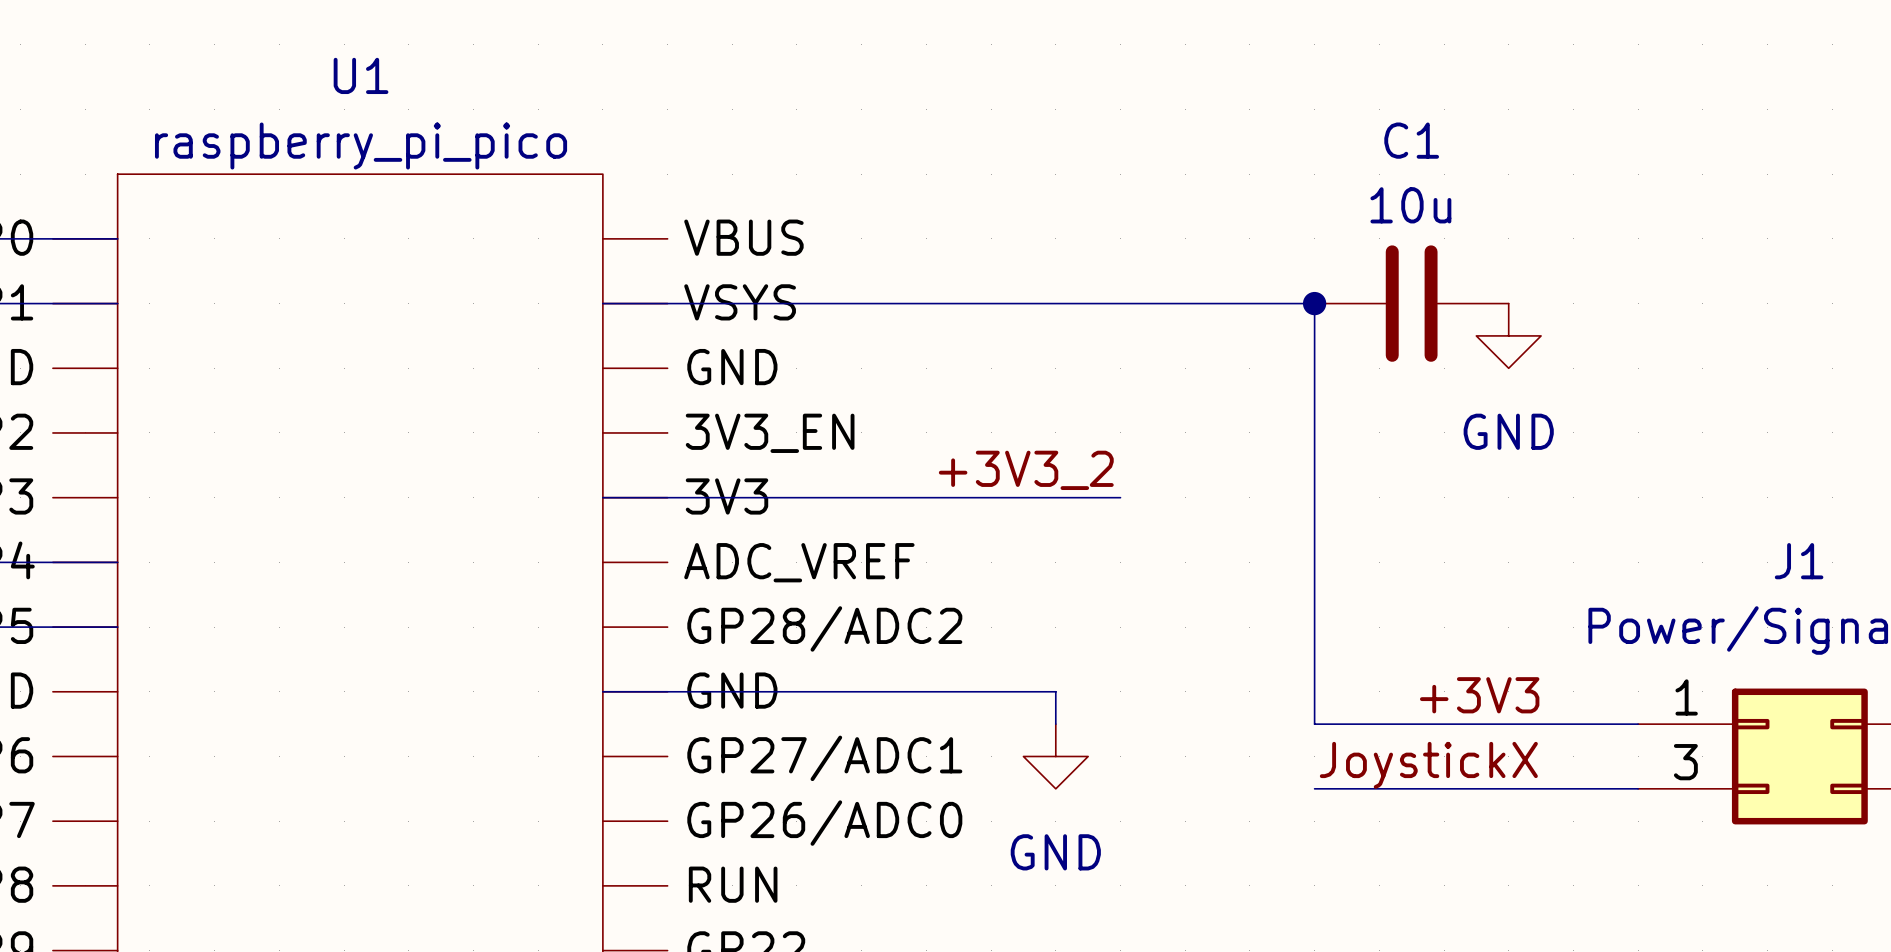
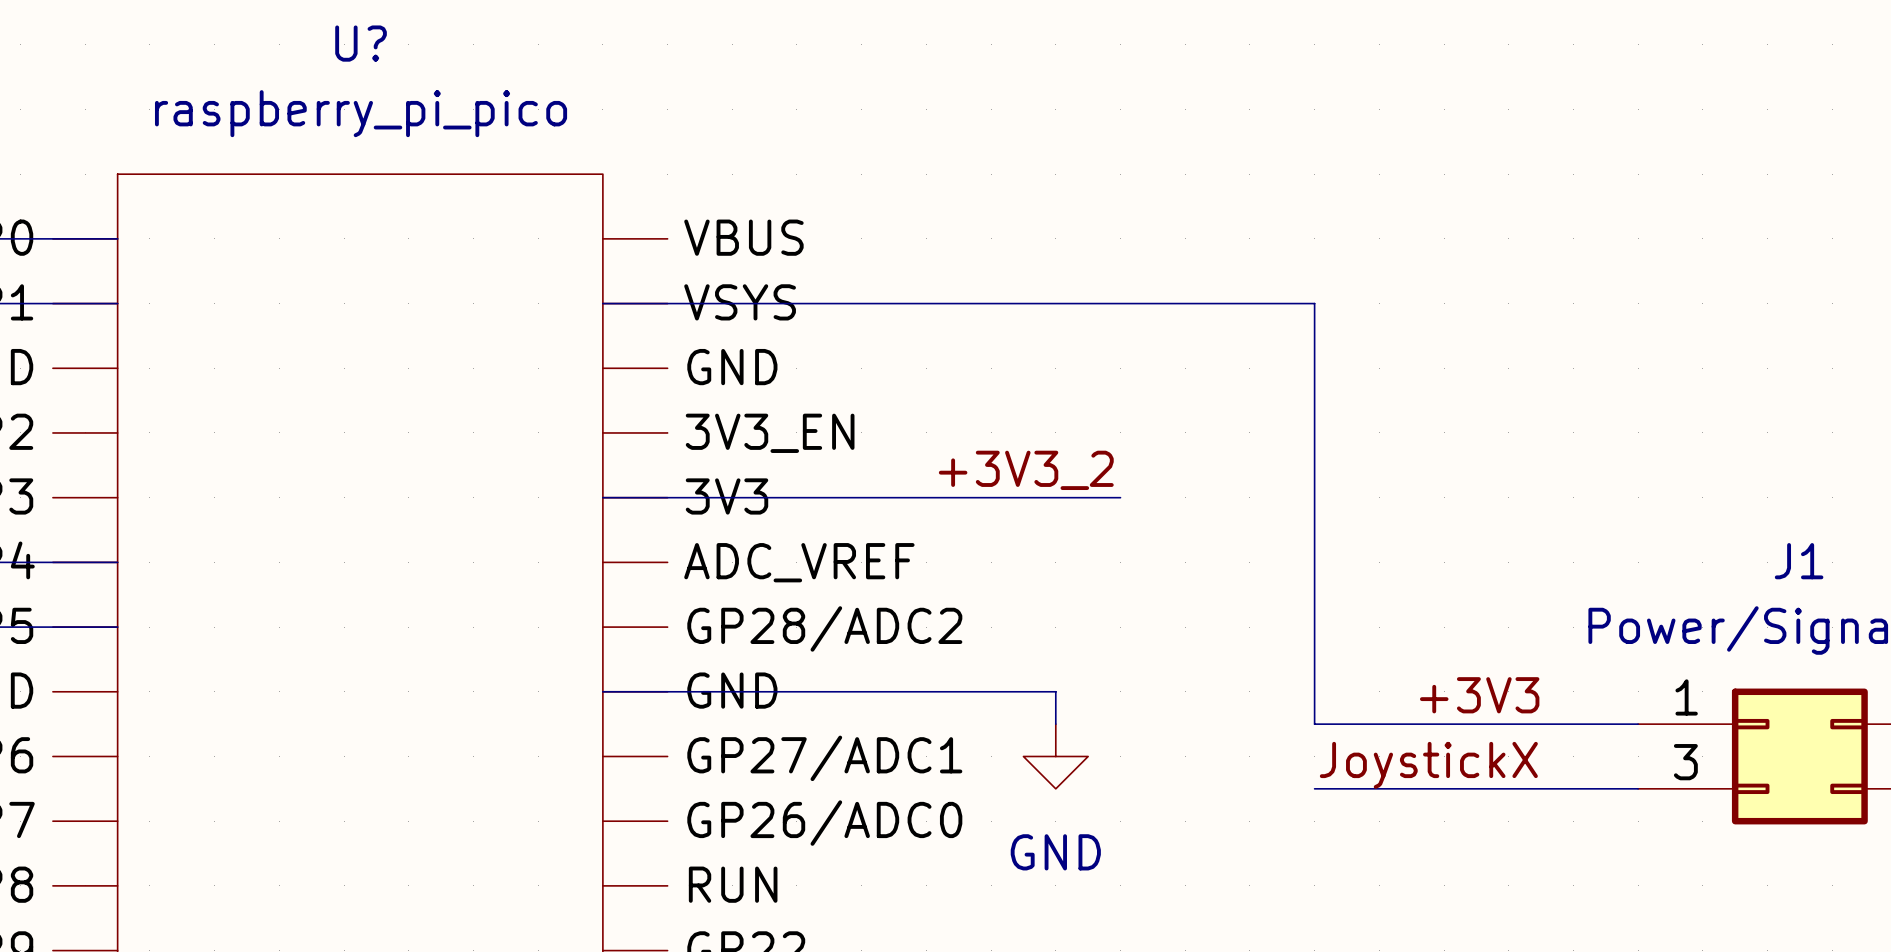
U1 name: U1 (361, 75) -> U? (361, 43)
U1 value position: raspberry_pi_pico (361, 146) -> raspberry_pi_pico (361, 113)
junction: (1314, 303) -> none
C1: 10u (1411, 303) -> none
power symbol: GND (1508, 335) -> none

